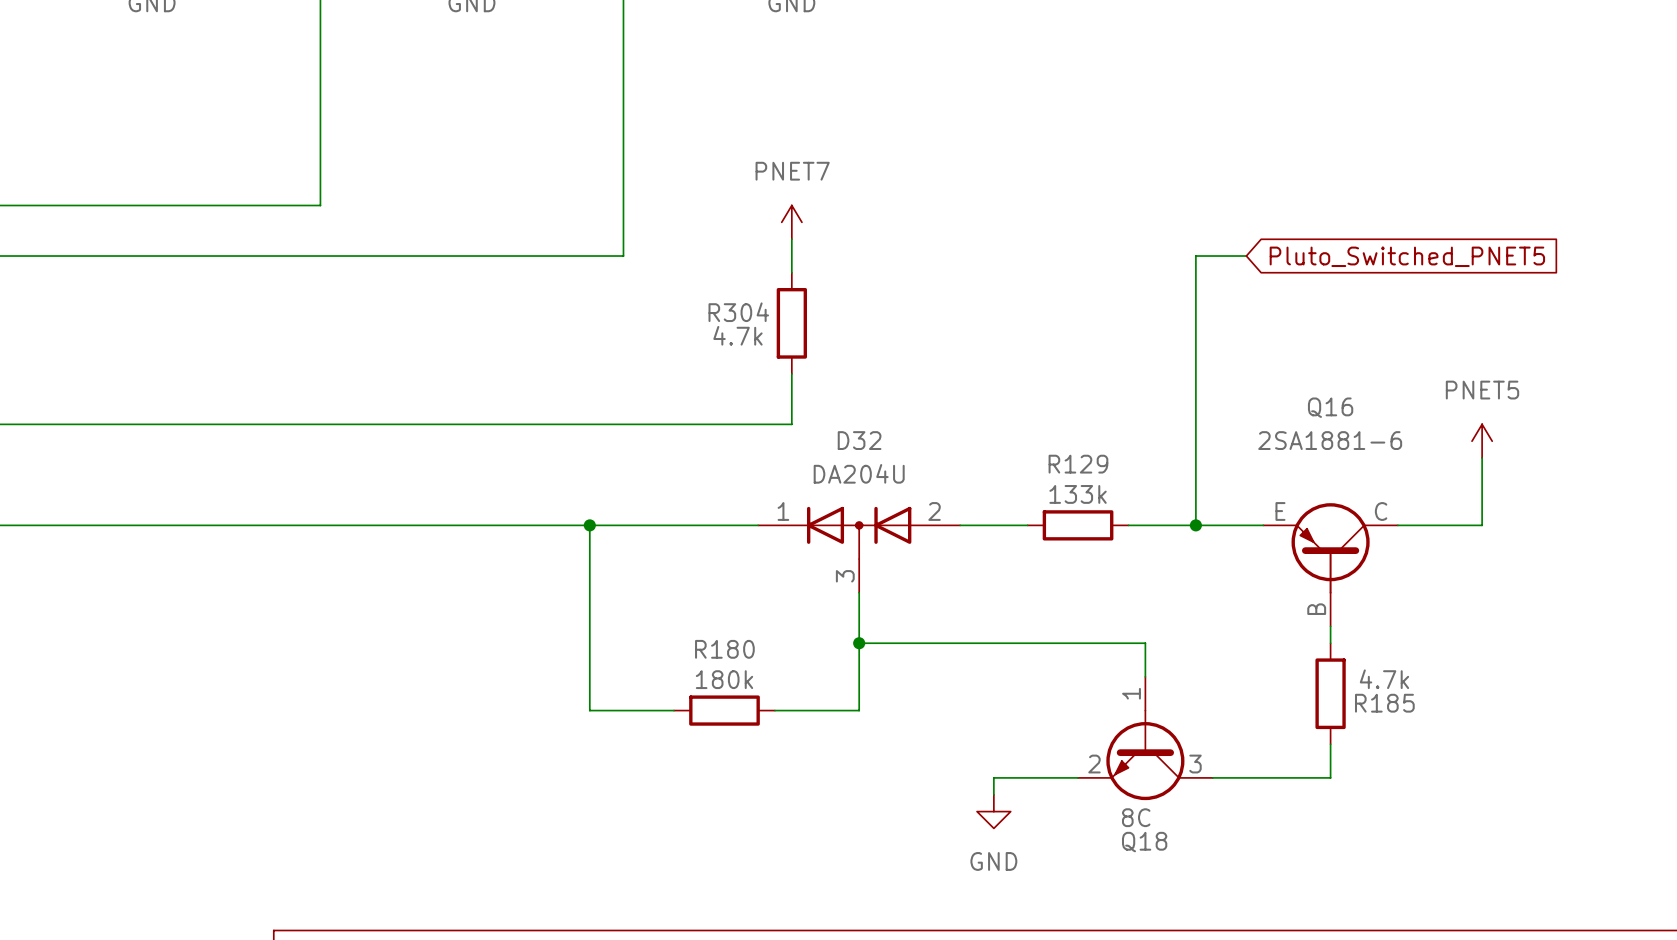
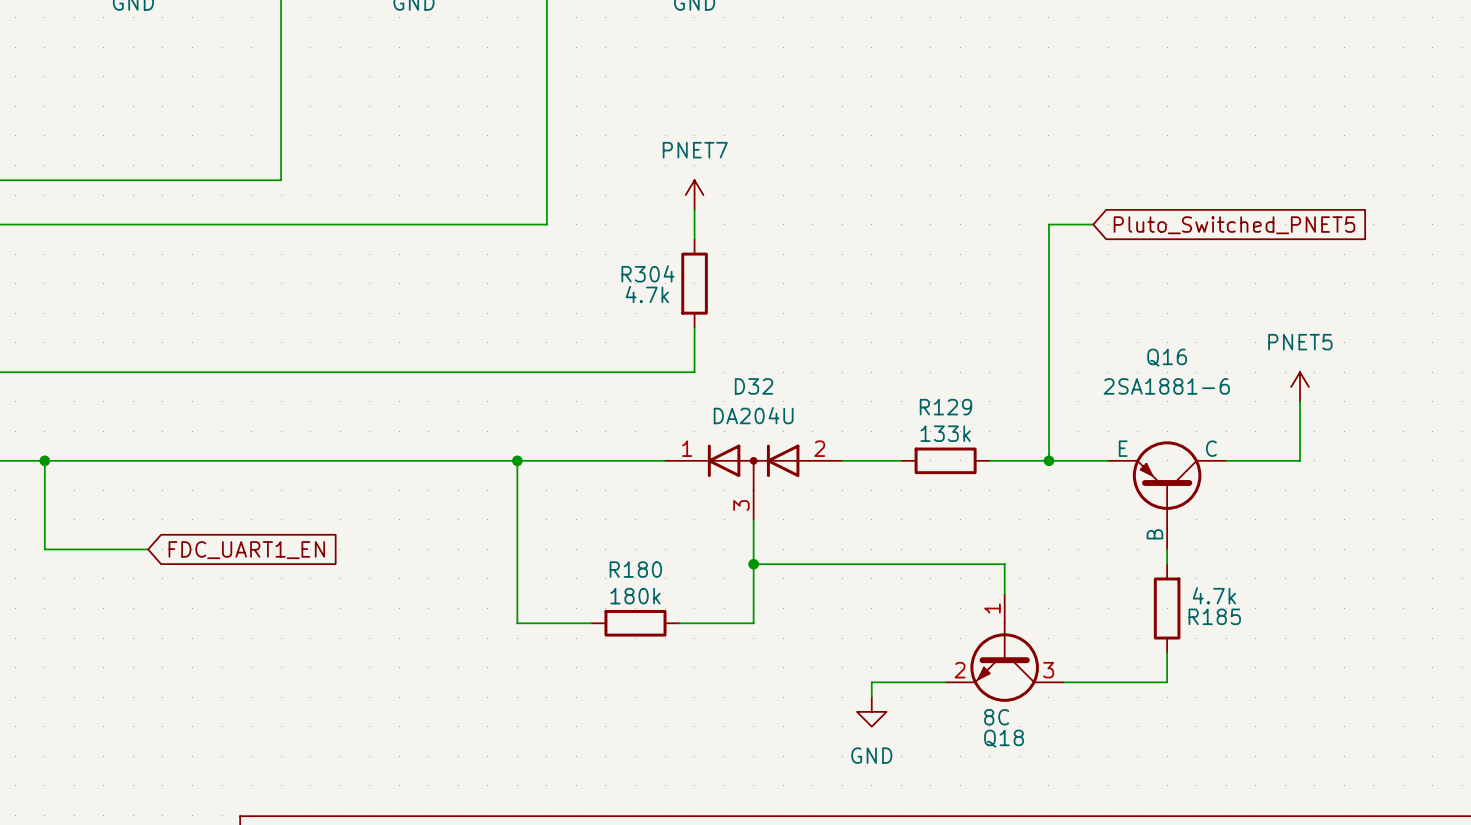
wire: none -> (44, 460) (44, 549) (148, 549)
junction: none -> (44, 460)
global label: none -> FDC_UART1_EN (246, 550)

